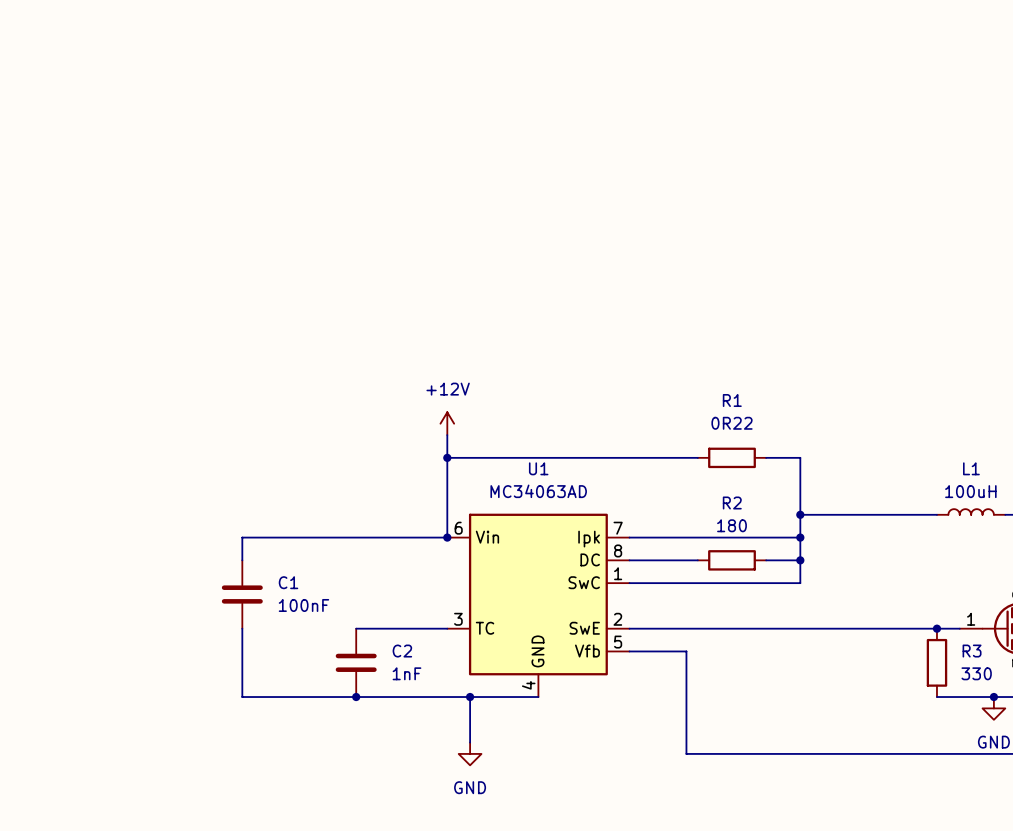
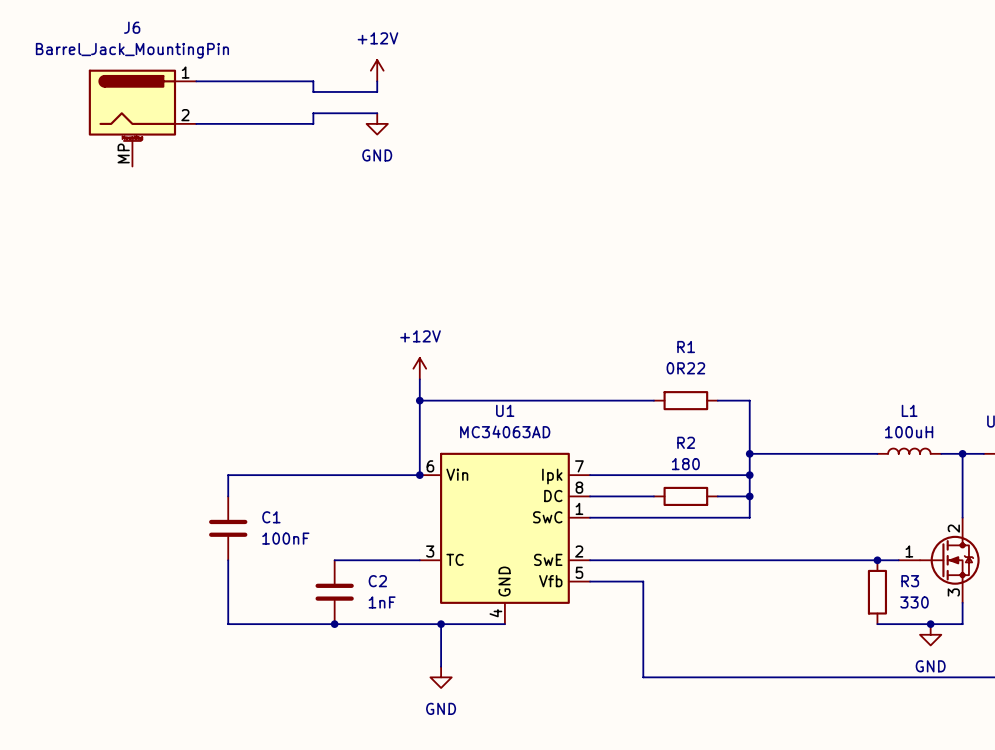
power symbol: none -> +12V (377, 70)
wire: none -> (196, 81) (313, 81) (313, 91) (377, 91) (377, 81)
wire: none -> (377, 113) (313, 113) (313, 123) (196, 123)
J6: none -> Barrel_Jack_MountingPin (142, 118)
power symbol: none -> GND (377, 123)

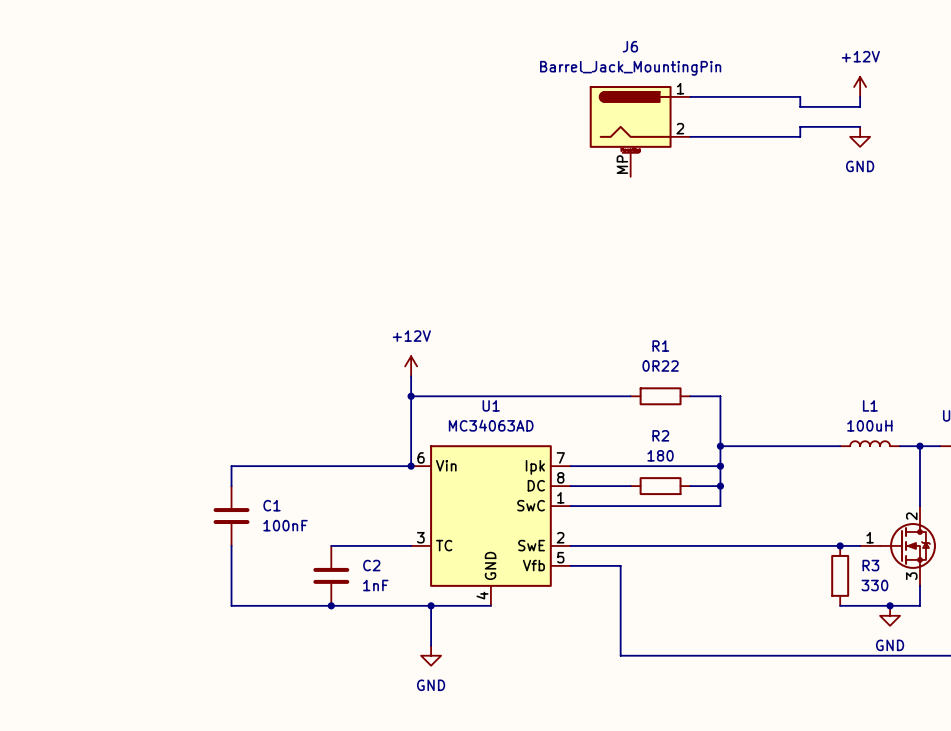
power symbol: +12V (377, 70) -> none
power symbol: none -> +12V (860, 86)
wire: (196, 81) (313, 81) (313, 91) (377, 91) (377, 81) -> none
wire: none -> (690, 96) (800, 96) (800, 106) (860, 106) (860, 96)
wire: (377, 113) (313, 113) (313, 123) (196, 123) -> none
wire: none -> (860, 126) (800, 126) (800, 136) (690, 136)
J6 position: (142, 118) -> (640, 131)
power symbol: GND (377, 123) -> none
power symbol: none -> GND (860, 136)

